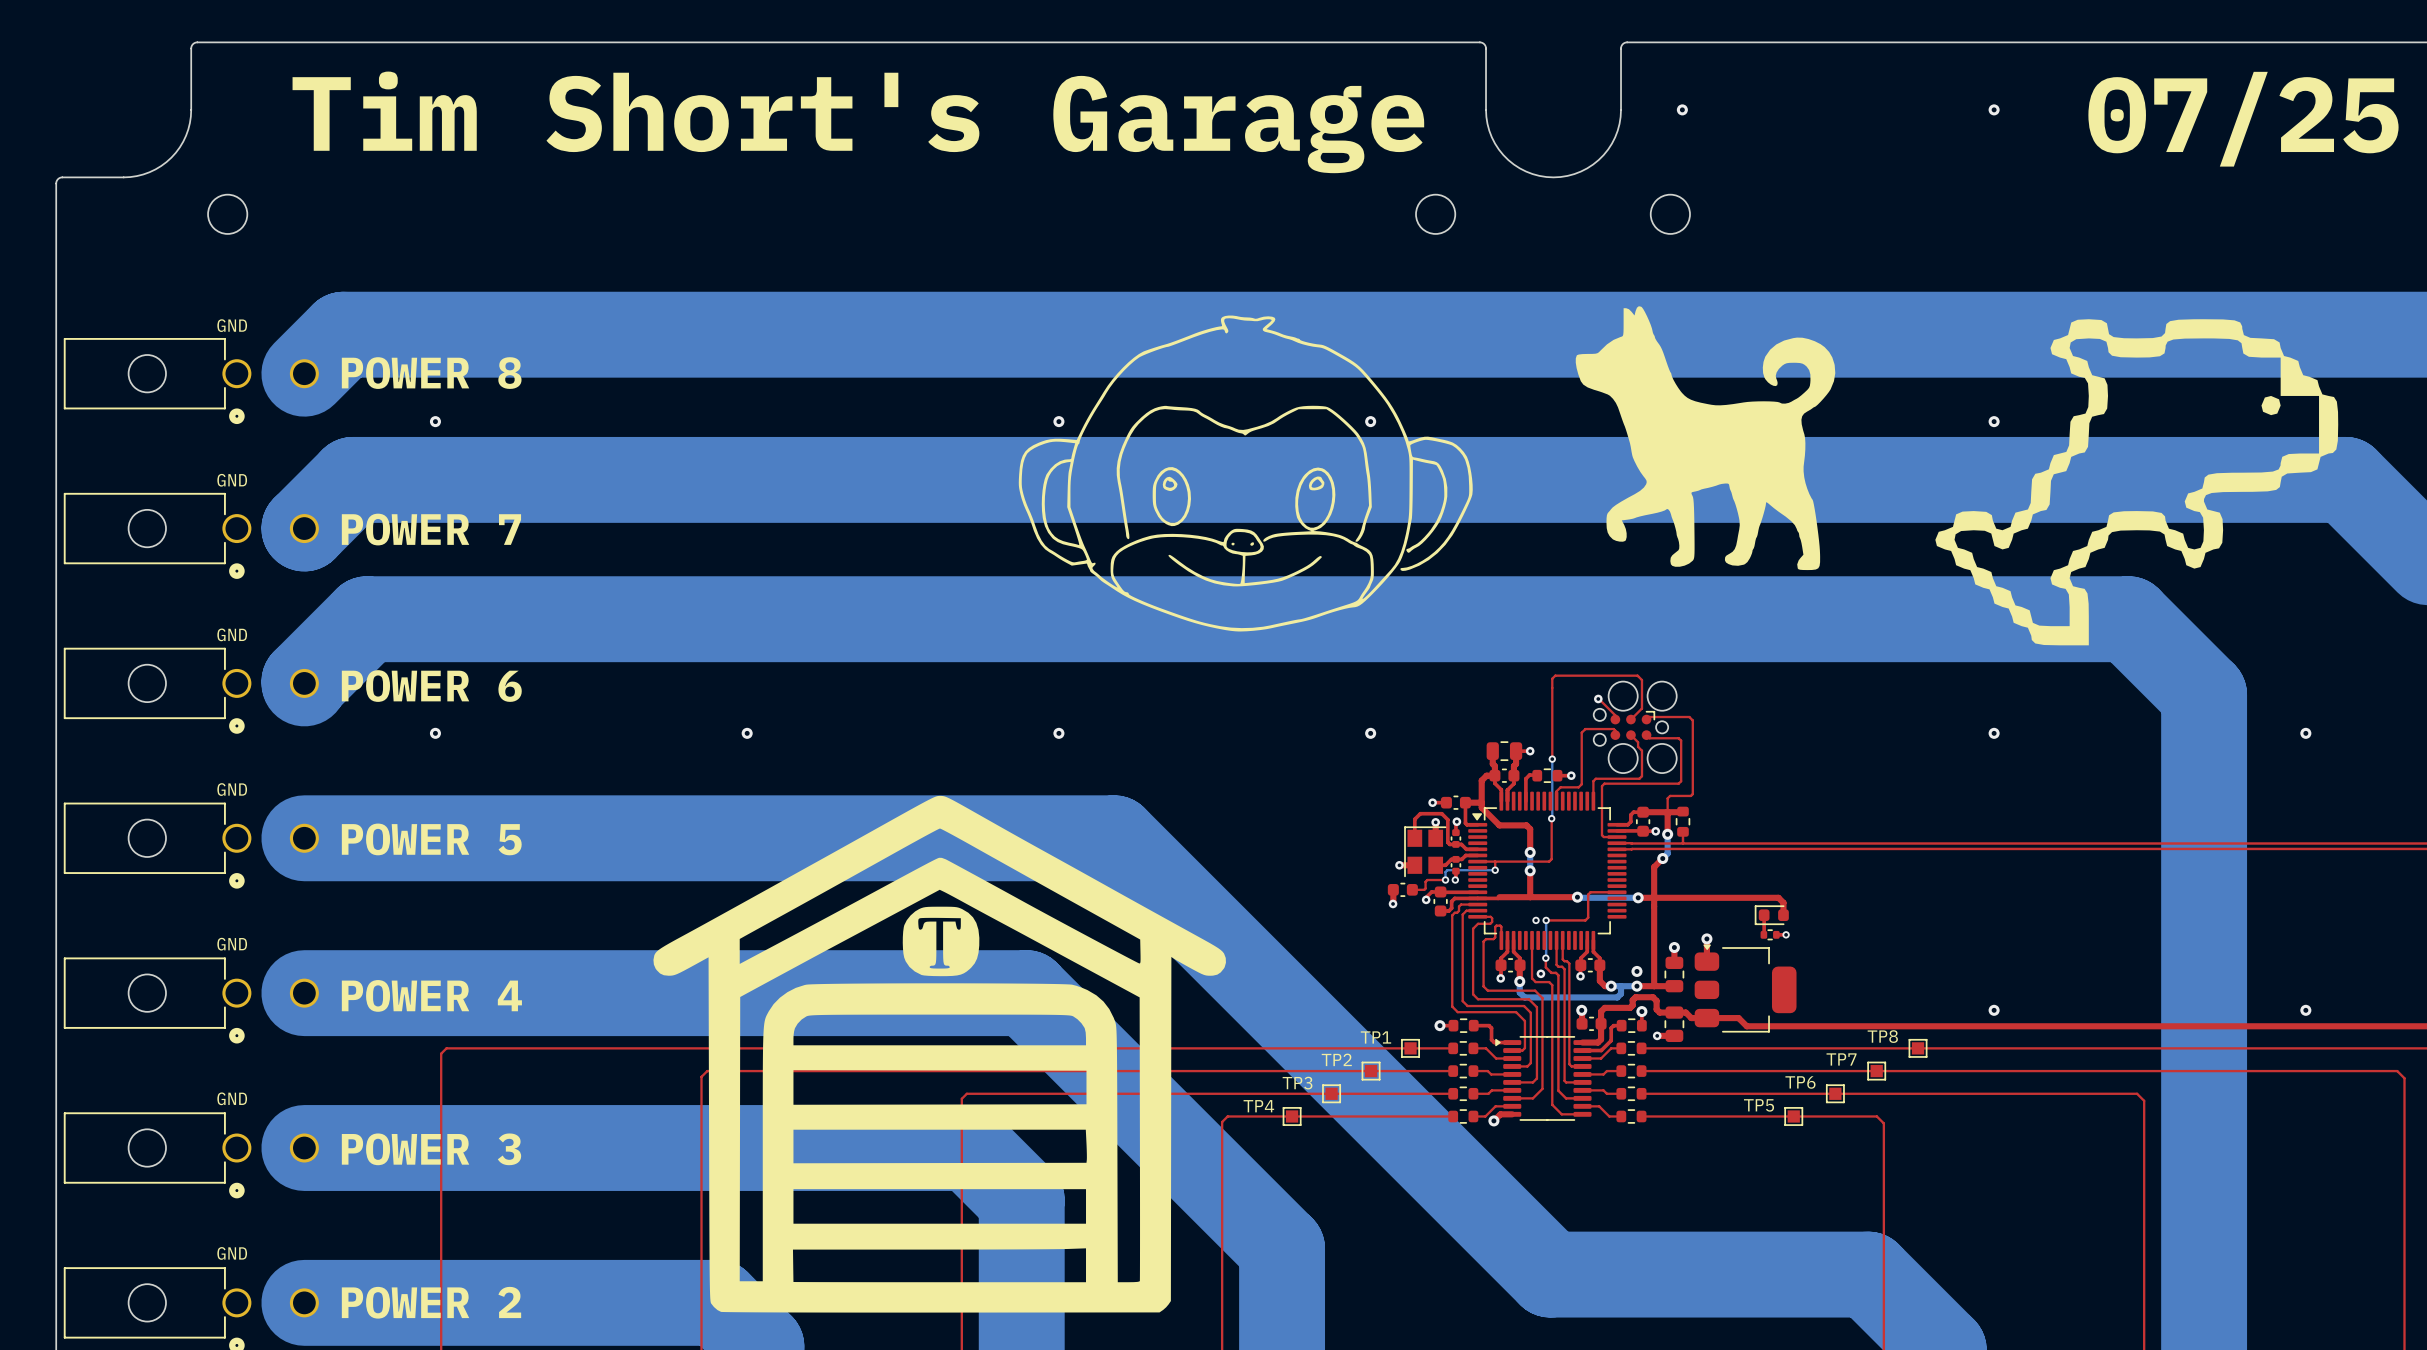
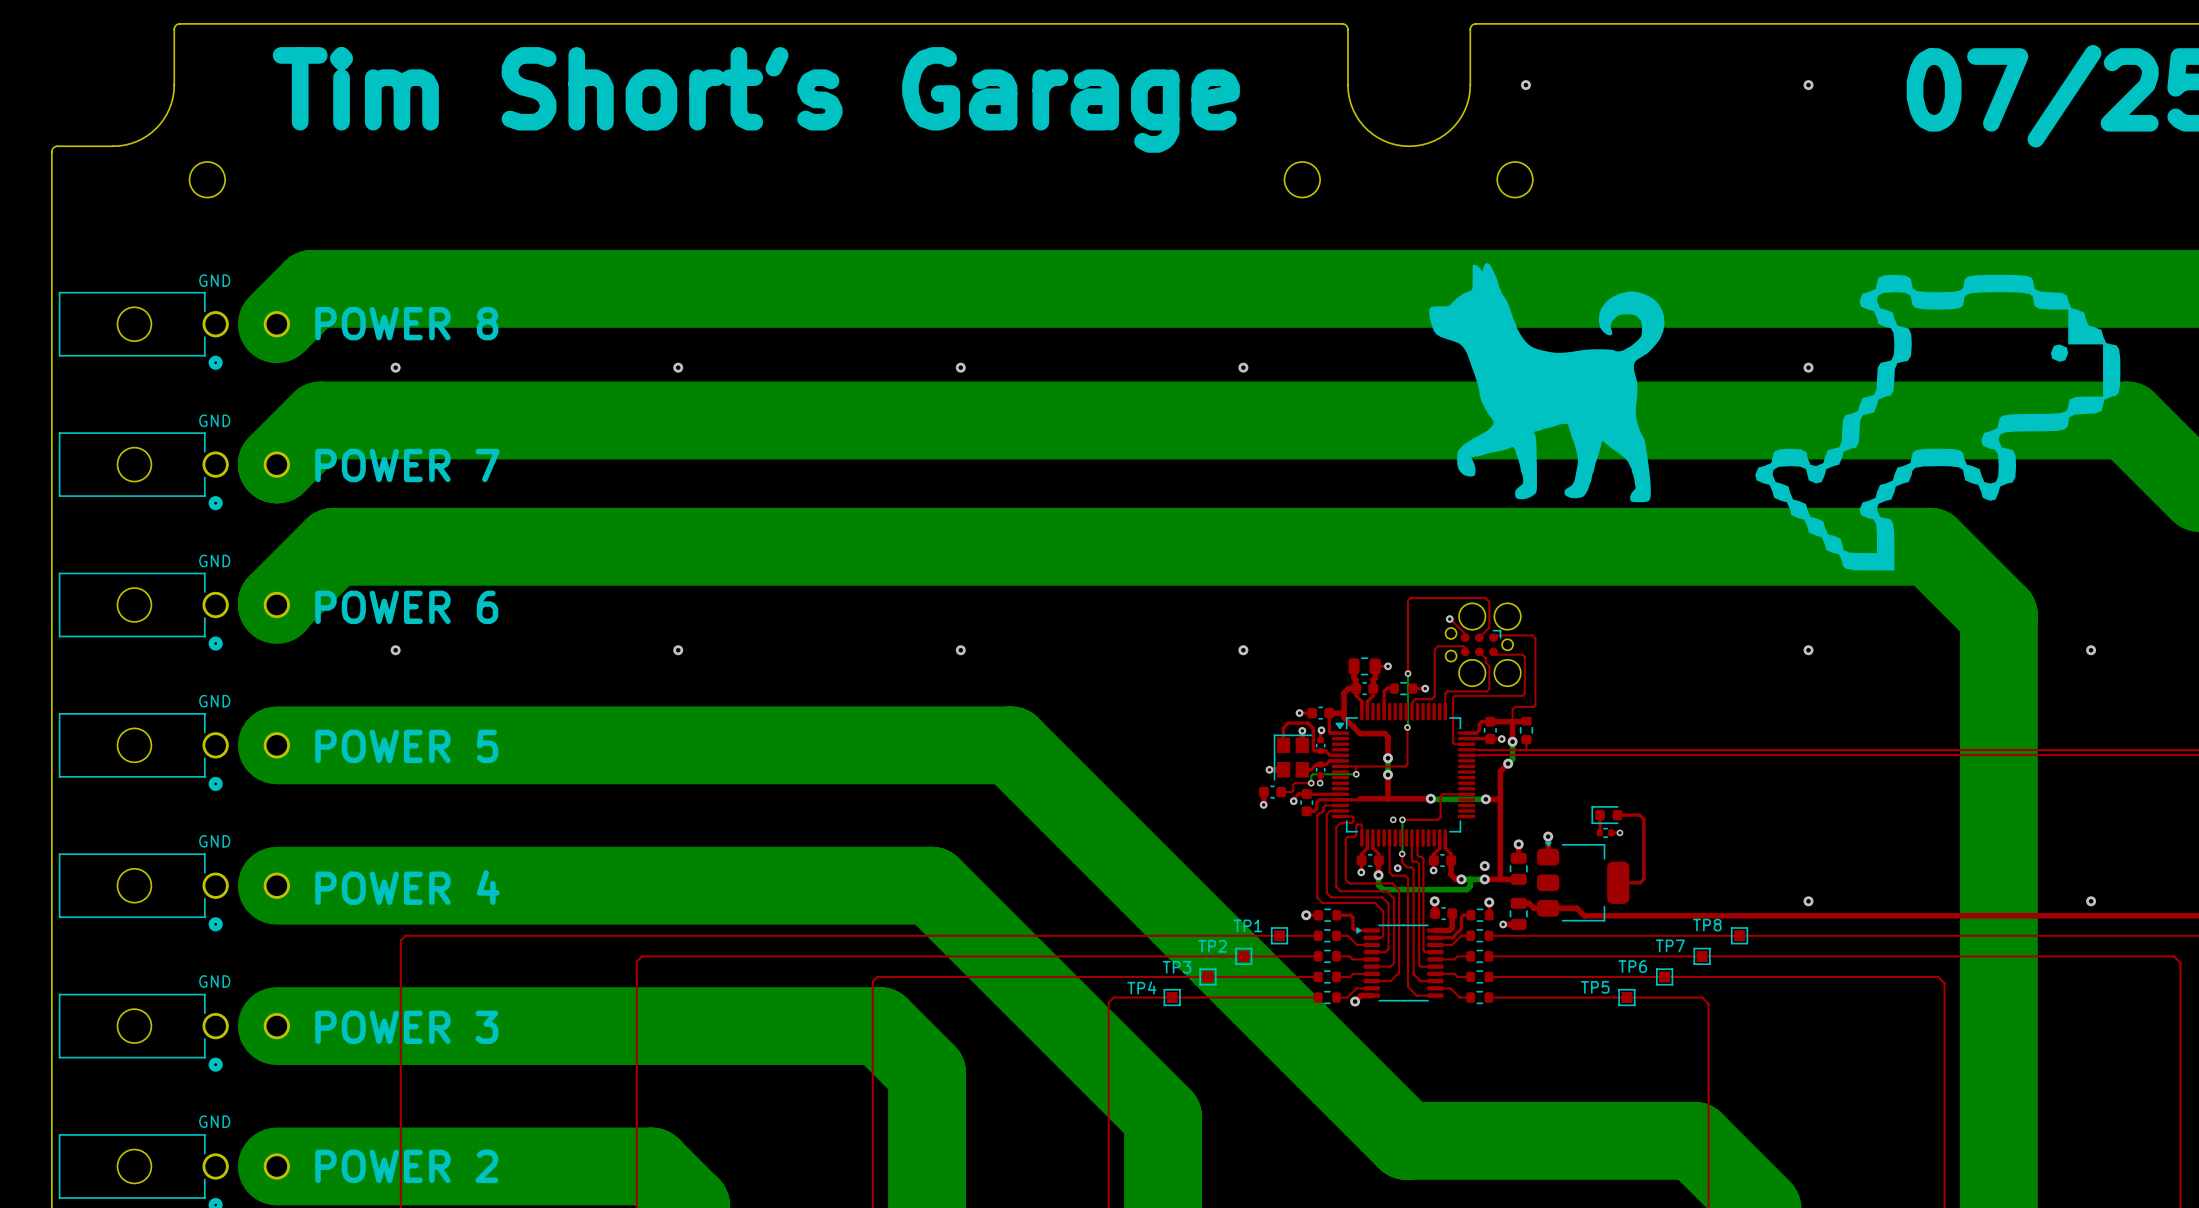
drawing: [1018, 315, 1473, 632] -> none
via: none -> (678, 367)
drawing: [653, 795, 1226, 1313] -> none
top track: (1654, 897) (1778, 897) (1783, 902) (1783, 915) -> (1618, 882) (1640, 882) (1643, 879) (1643, 819) (1639, 815) (1617, 815)
top track: (1674, 1012) (1659, 1012) (1656, 1009) (1656, 1000) (1652, 997) (1635, 997) (1630, 1007) (1604, 1007) (1601, 1011) (1601, 1023) -> none

